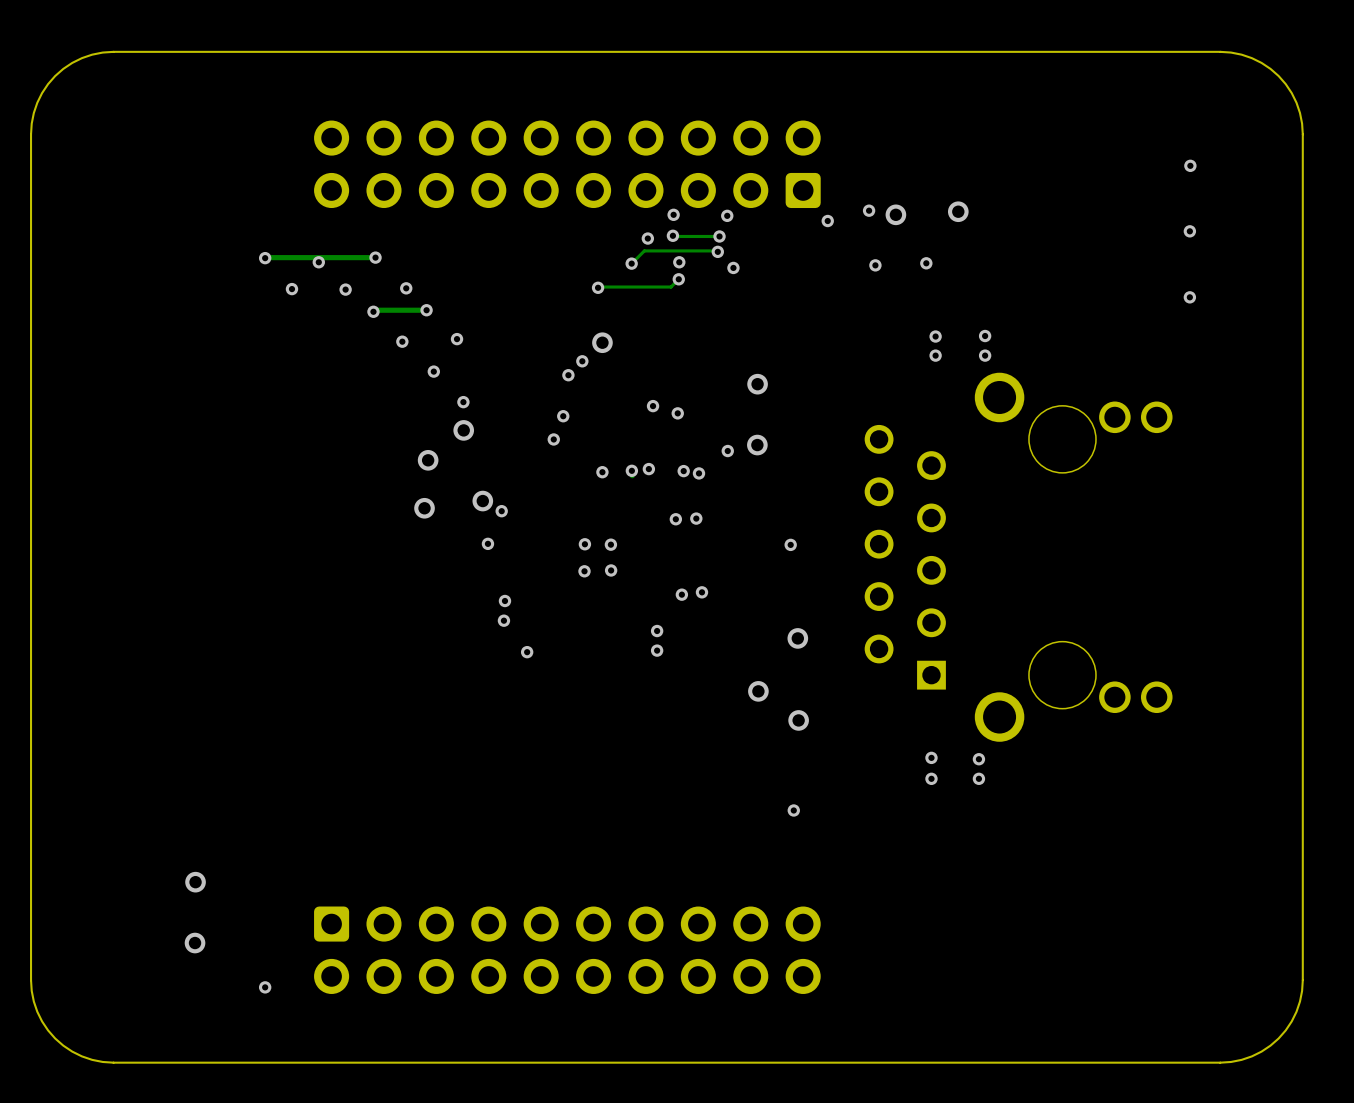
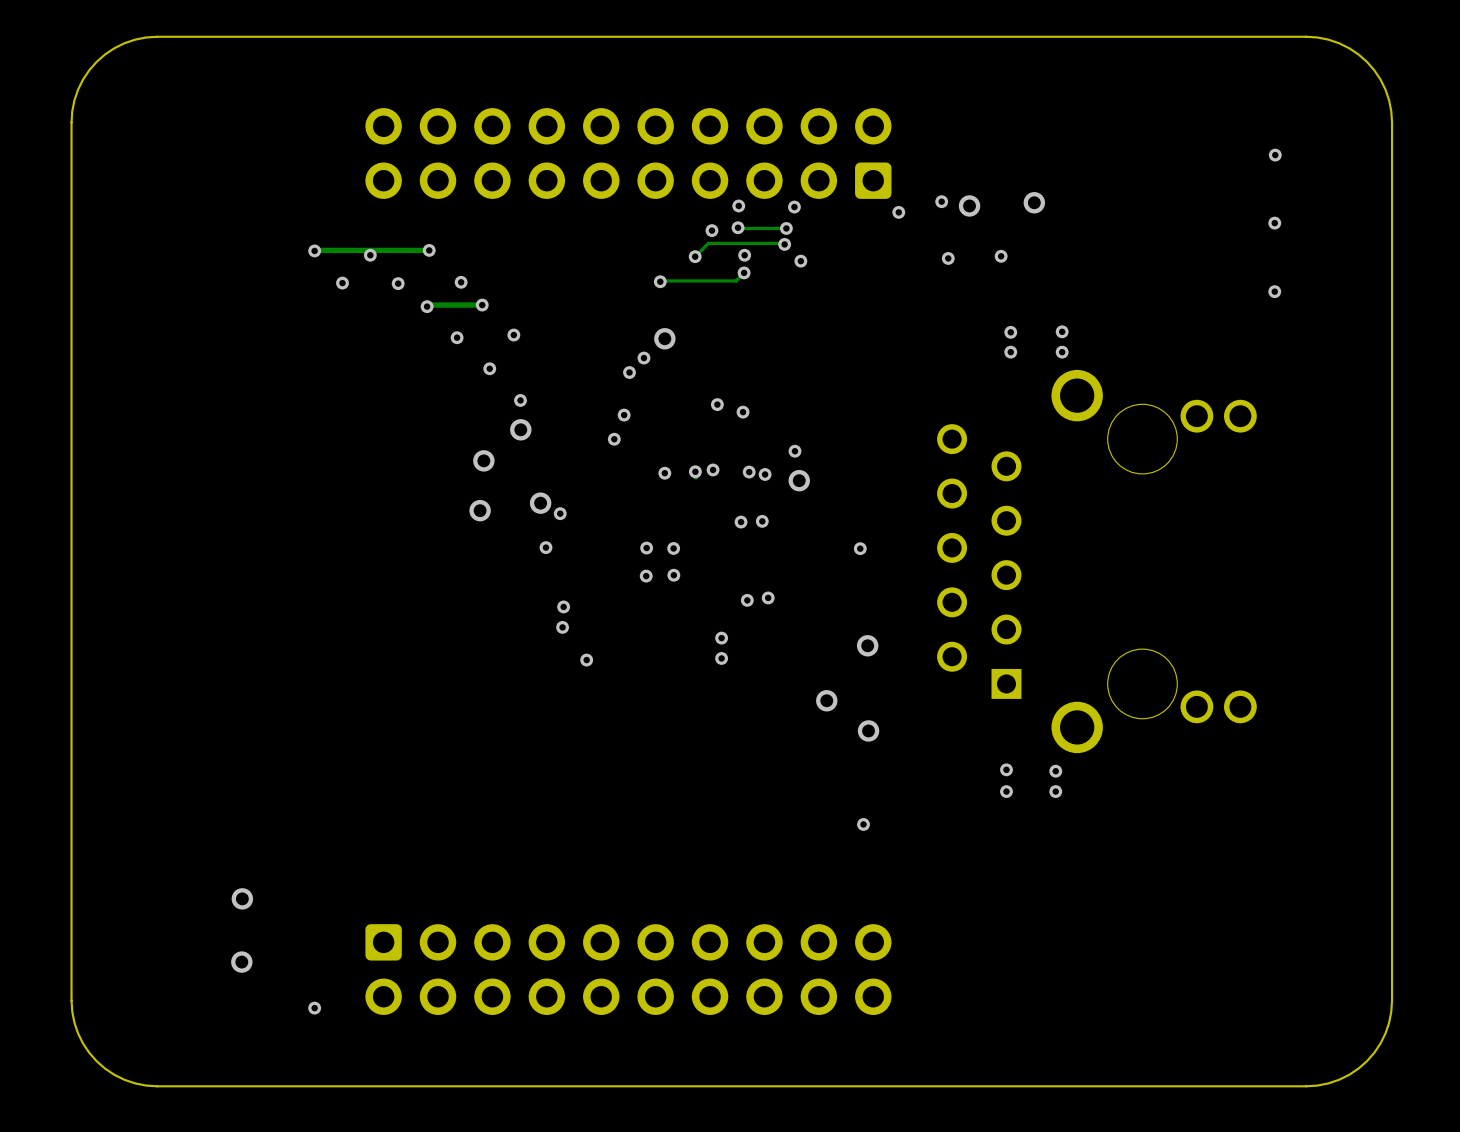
via: (757, 384) -> none
via position: (757, 445) -> (799, 480)

